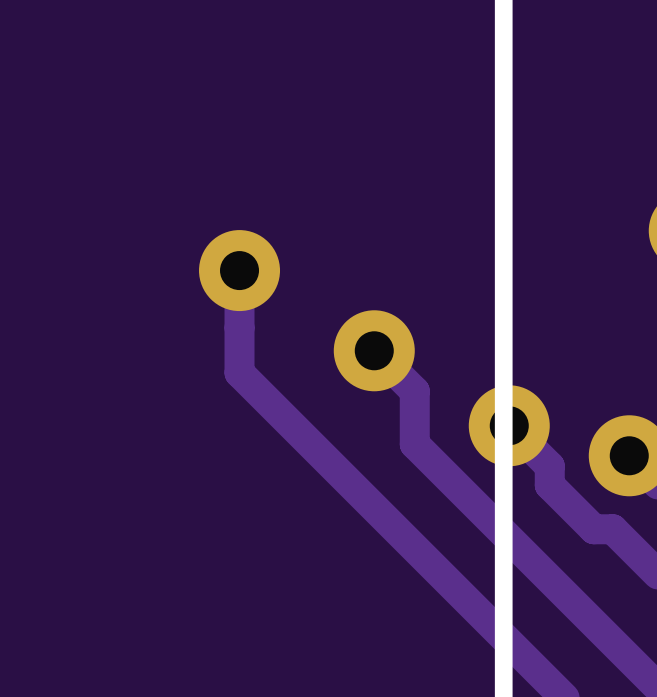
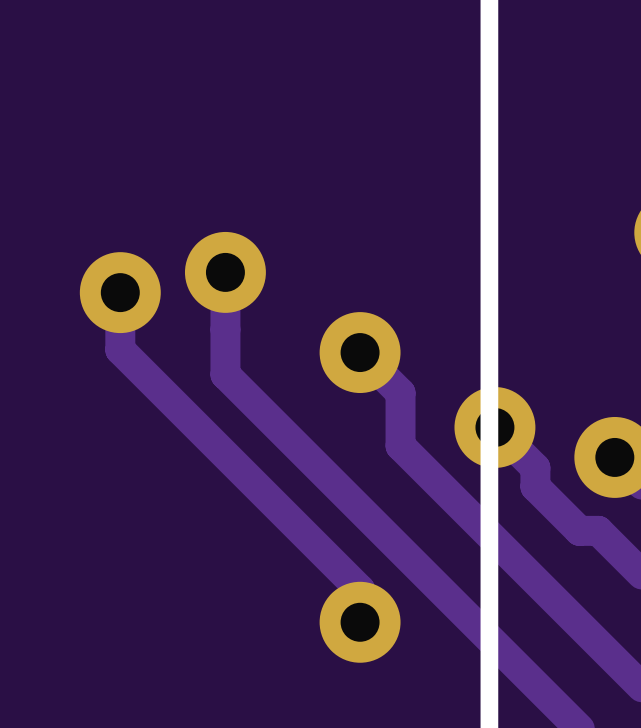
track: none -> (120, 292) (120, 349) (360, 589) (360, 622)
via: none -> (120, 292)
via: none -> (360, 622)

